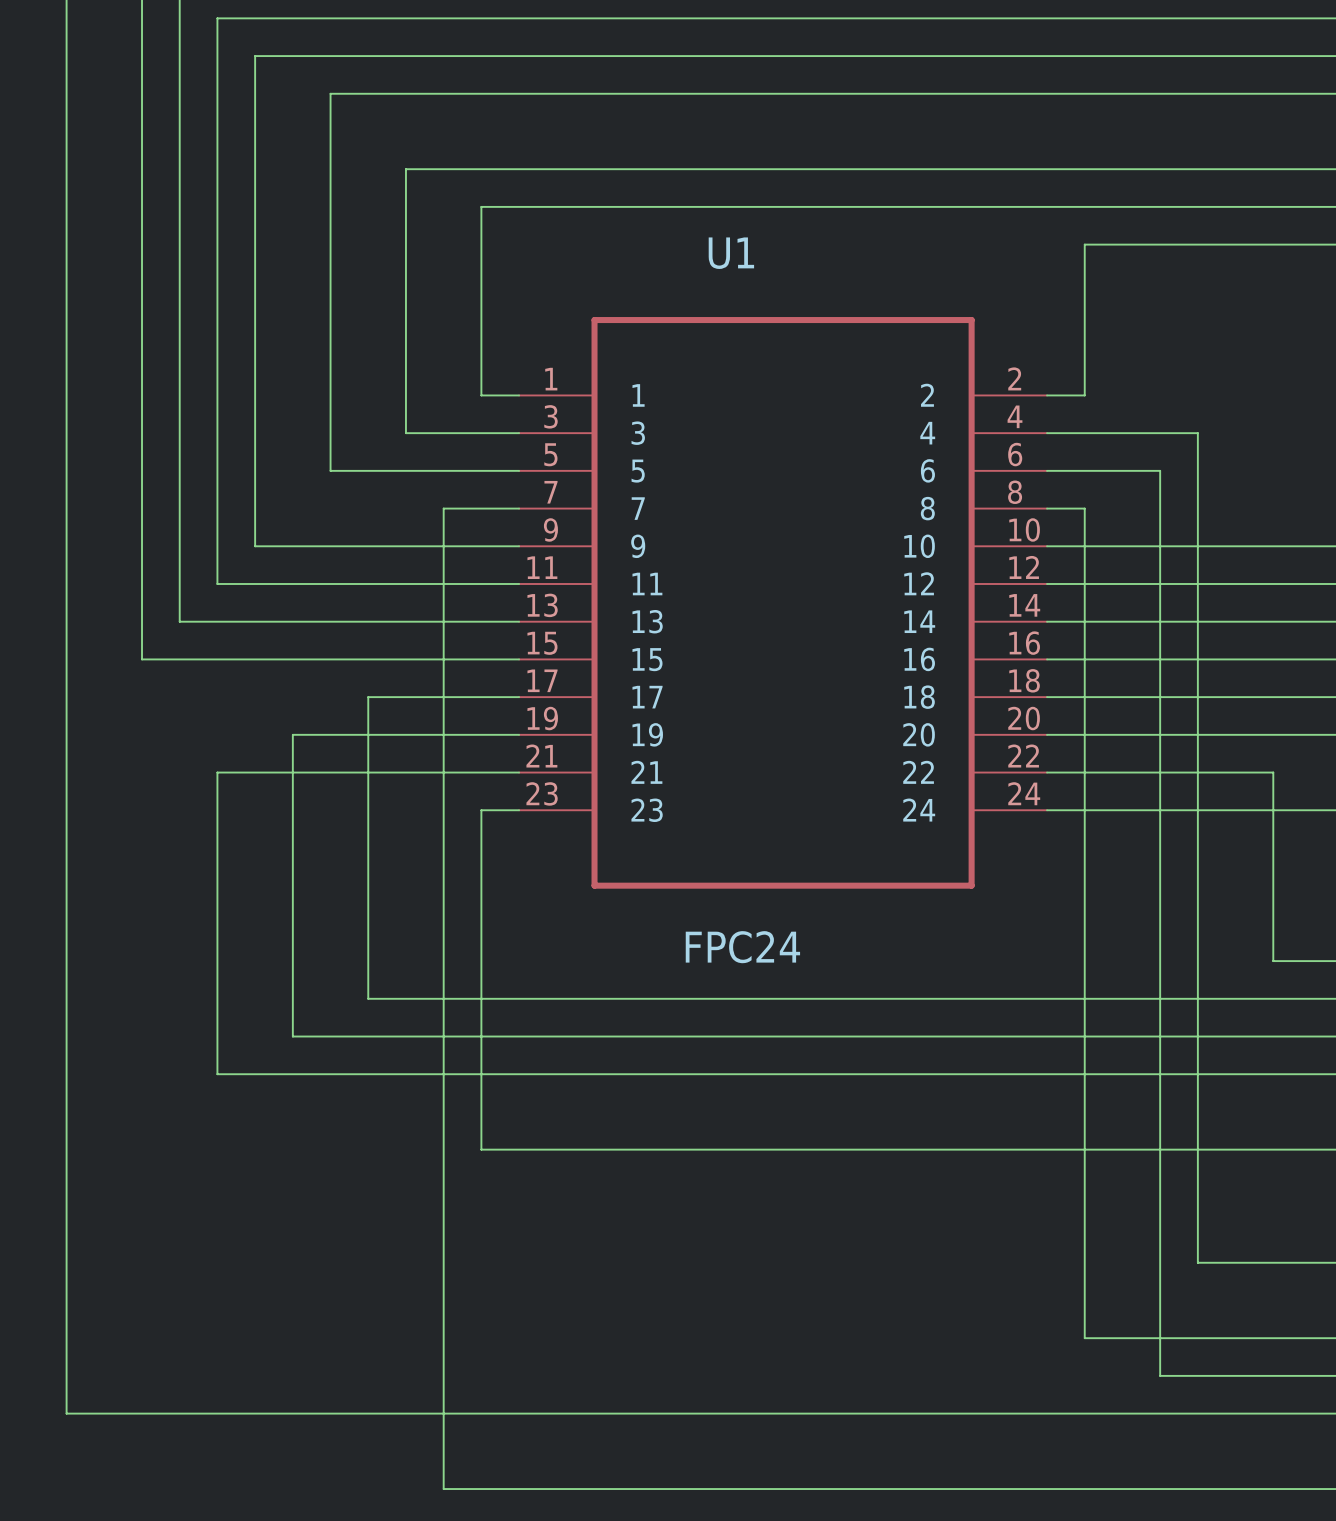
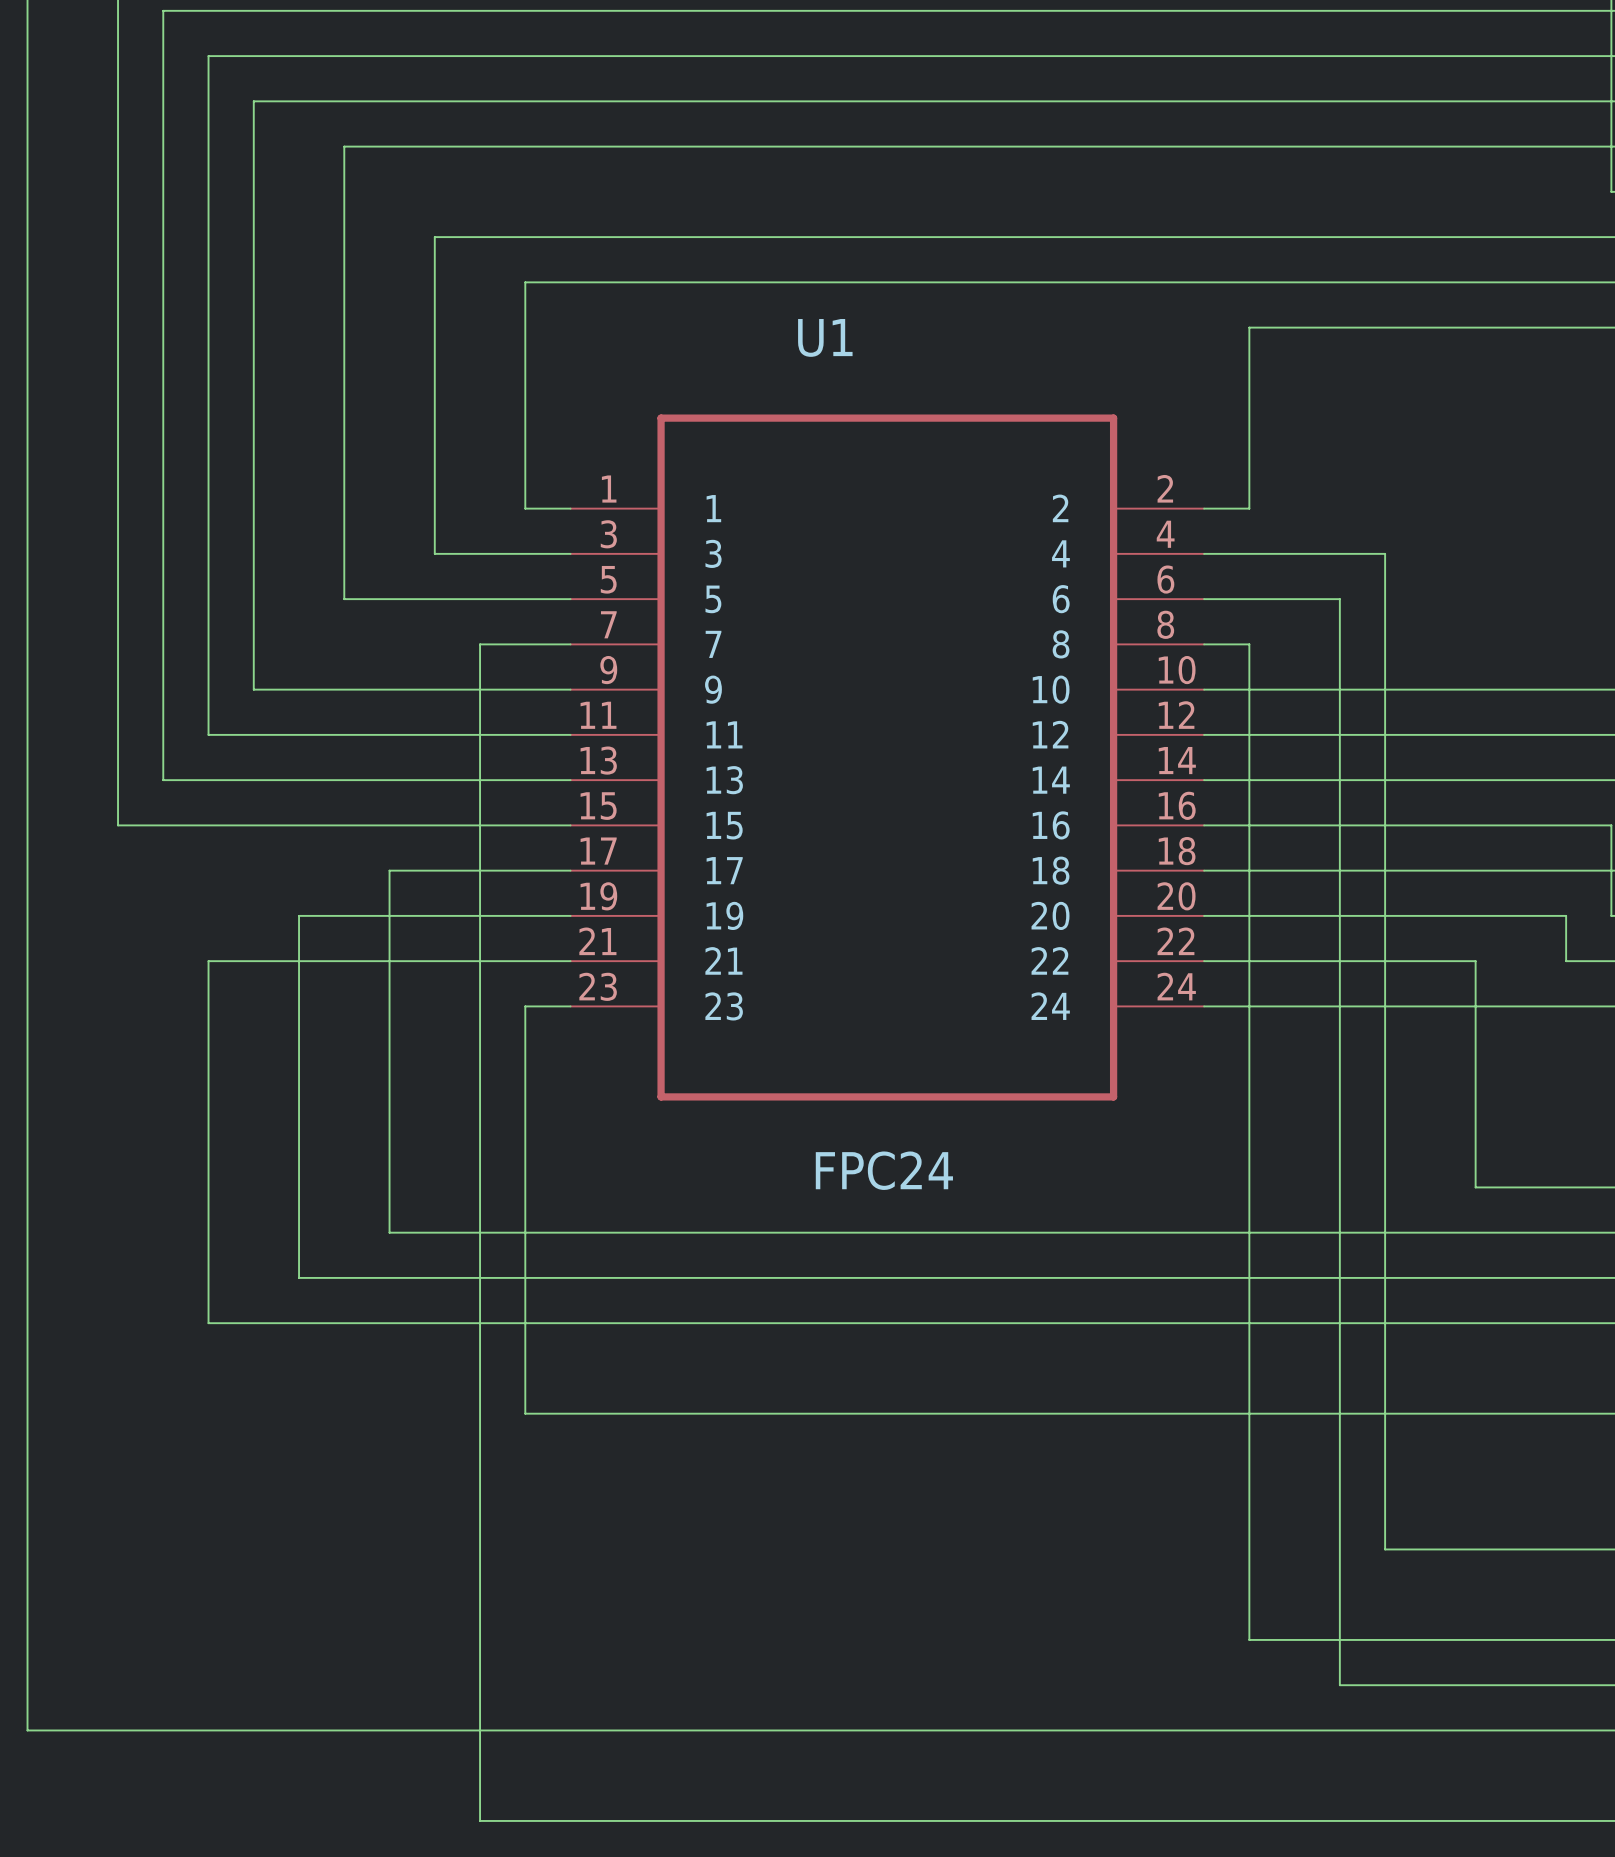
U1 value position: FPC24 (742, 947) -> FPC24 (884, 1170)

